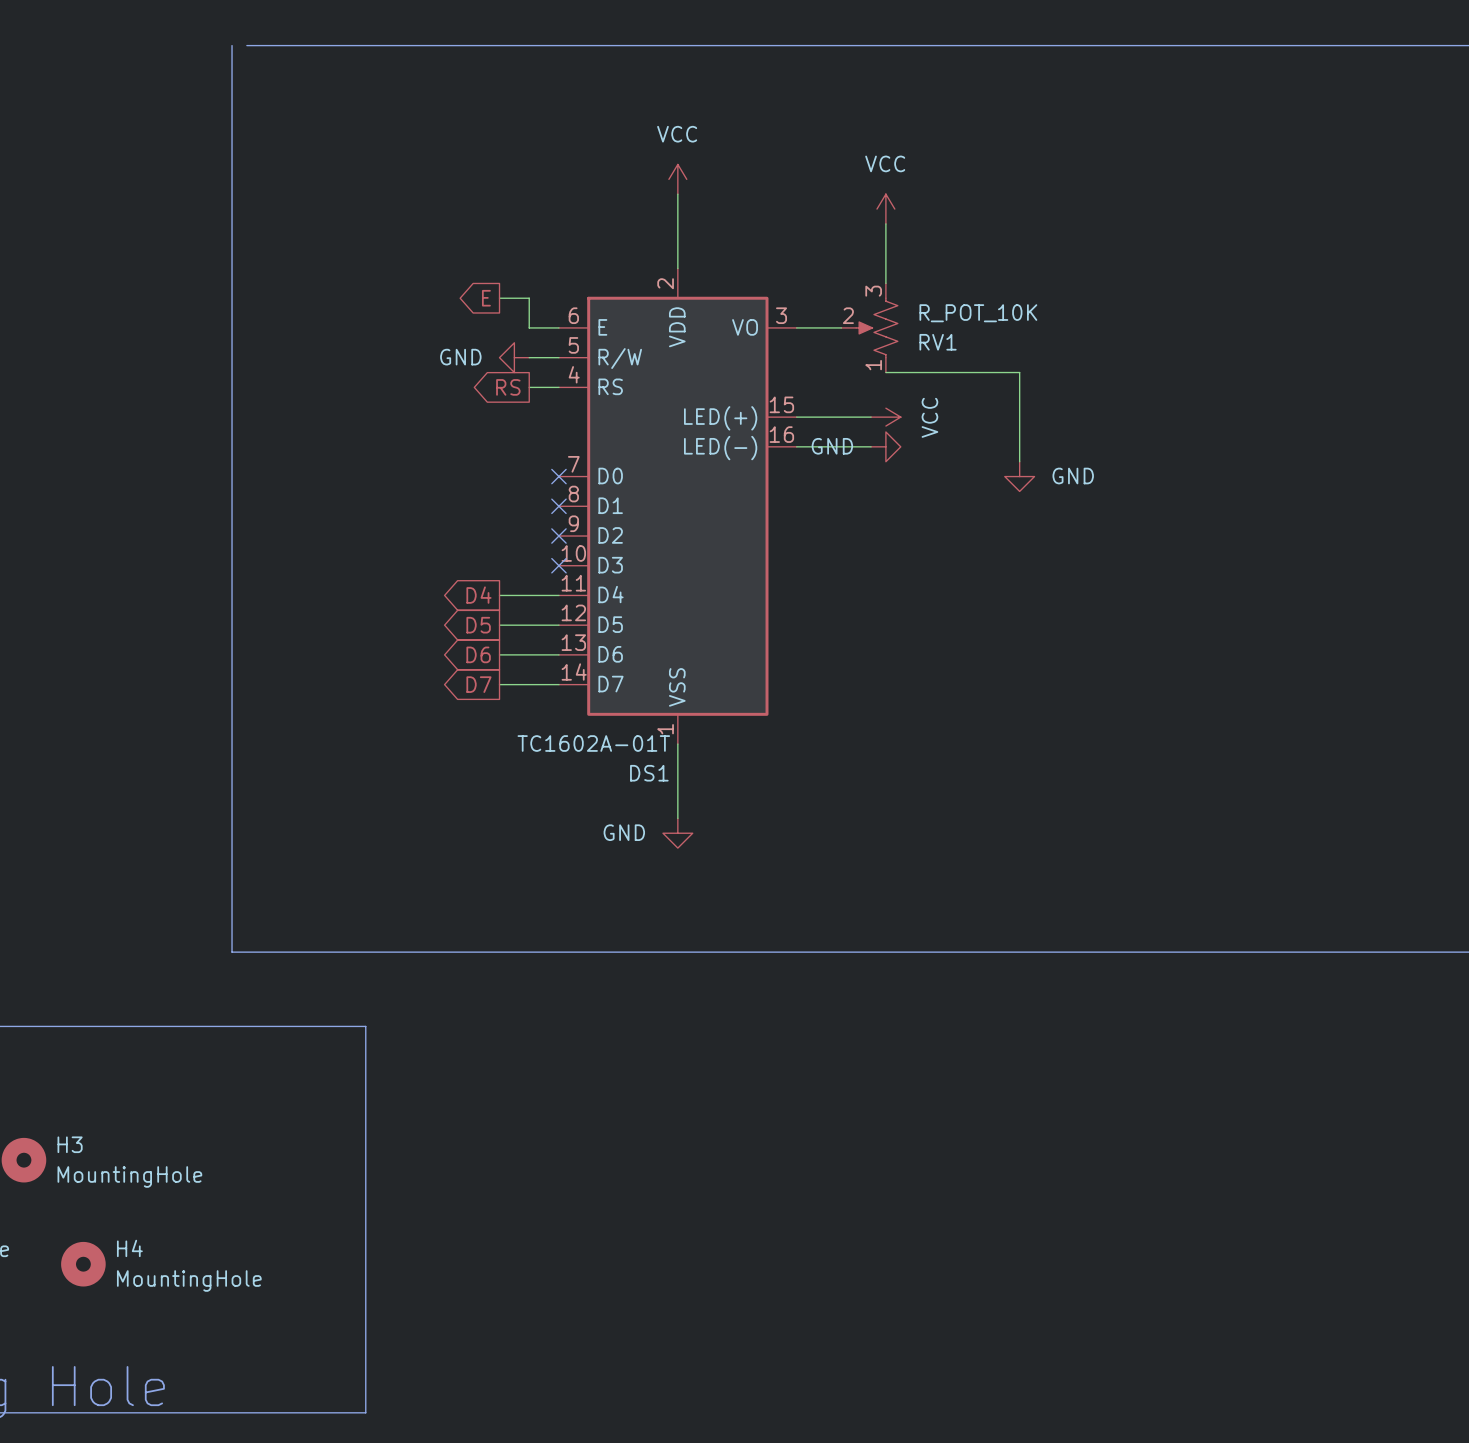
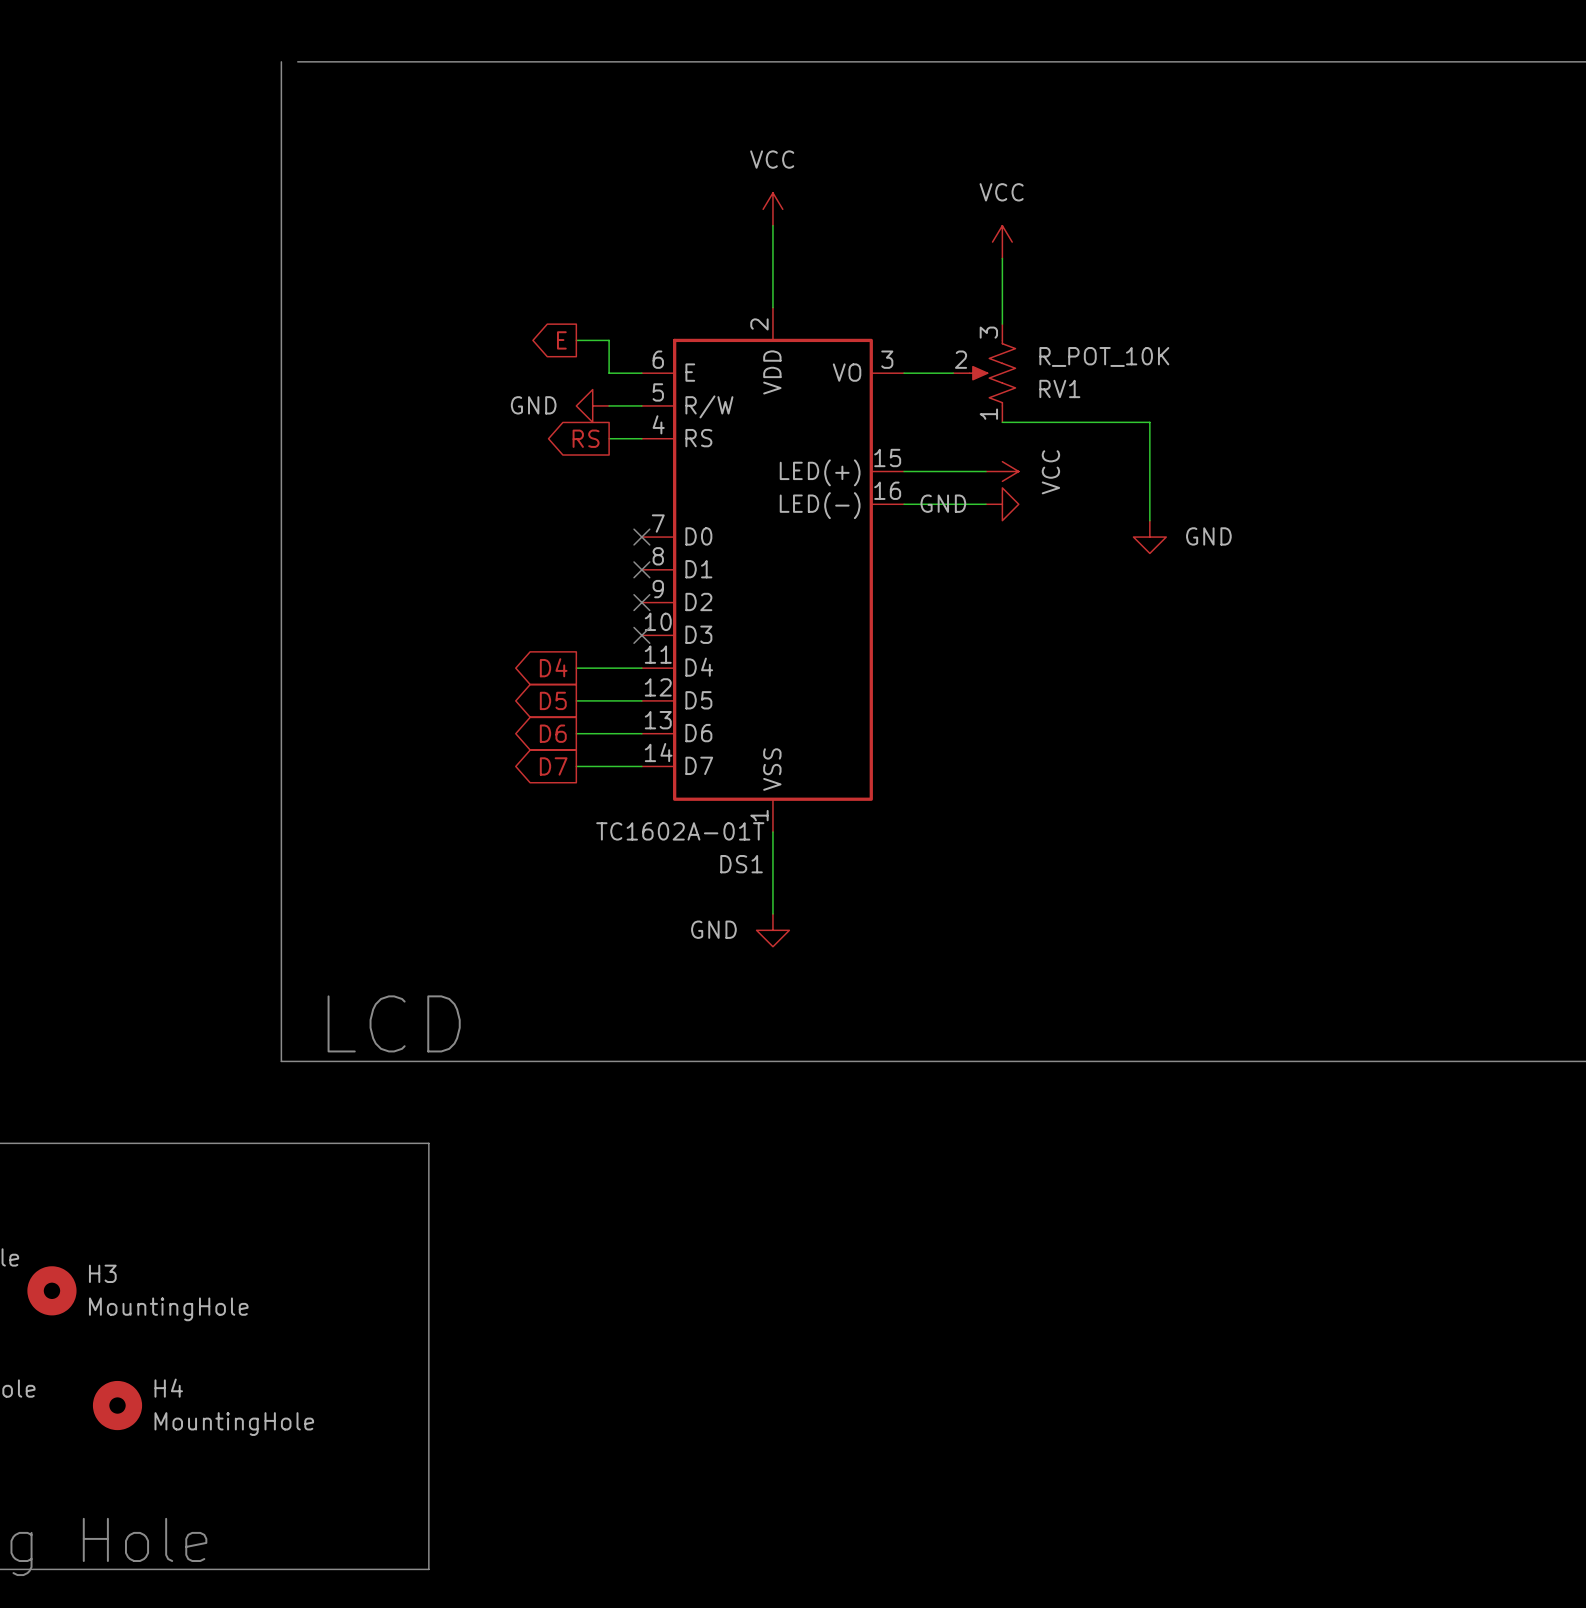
text: none -> LCD (394, 1023)

